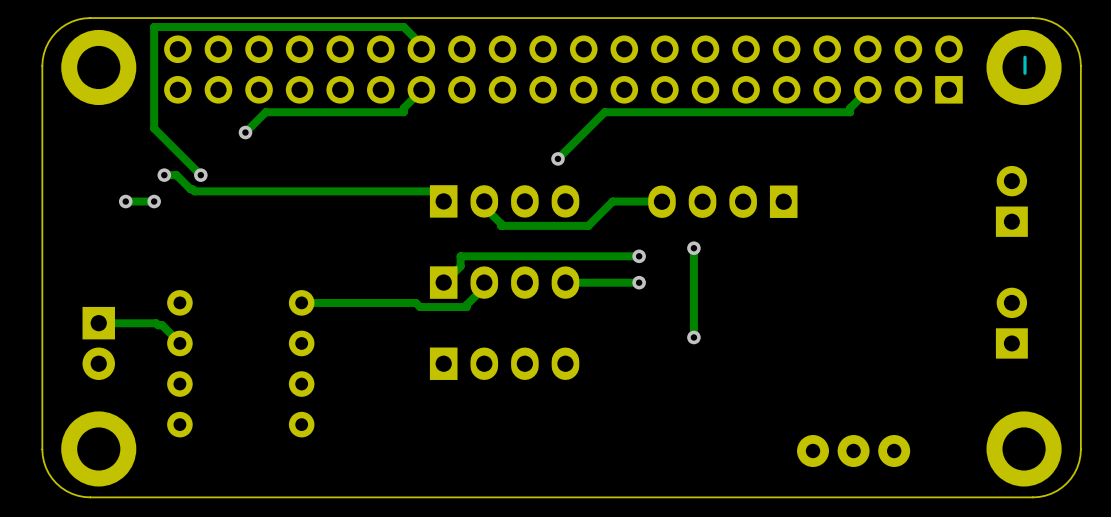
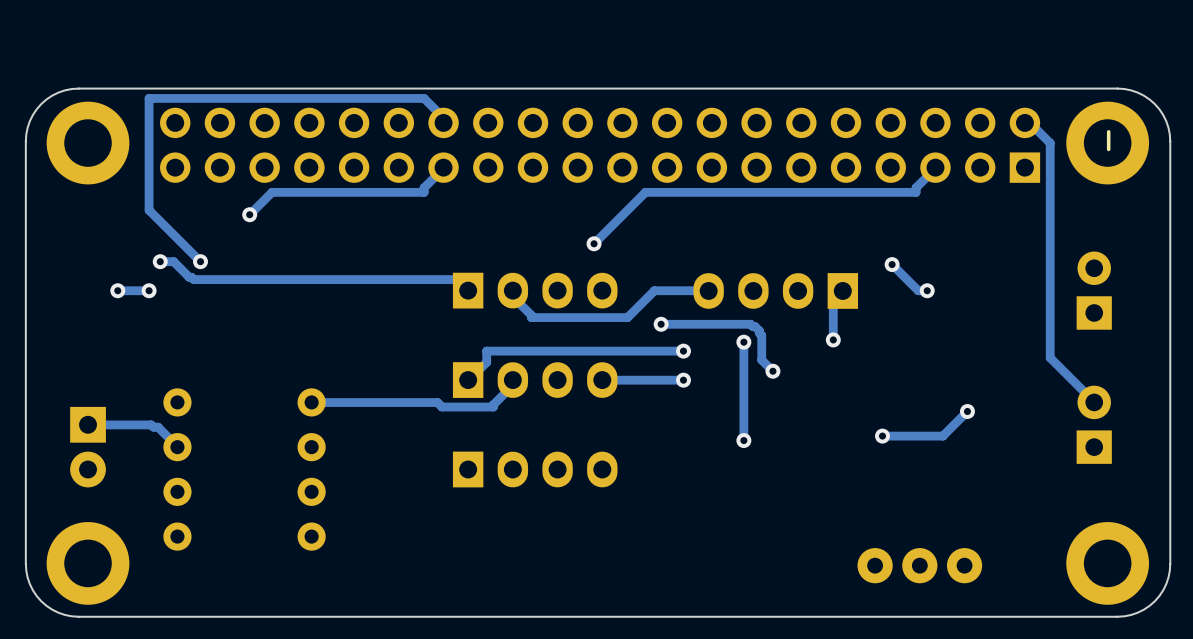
track: none -> (1024, 122) (1030, 123) (1050, 143) (1050, 357) (1094, 402)
track: none -> (892, 264) (918, 290) (927, 290)
via: none -> (892, 264)
track: none -> (842, 290) (833, 299) (833, 339)
via: none -> (927, 290)
track: none -> (661, 324) (750, 324) (759, 330) (761, 335) (761, 360) (772, 371)
via: none -> (661, 324)
via: none -> (833, 339)
via: none -> (772, 371)
track: none -> (967, 411) (942, 436) (882, 436)
via: none -> (967, 411)
via: none -> (882, 436)

